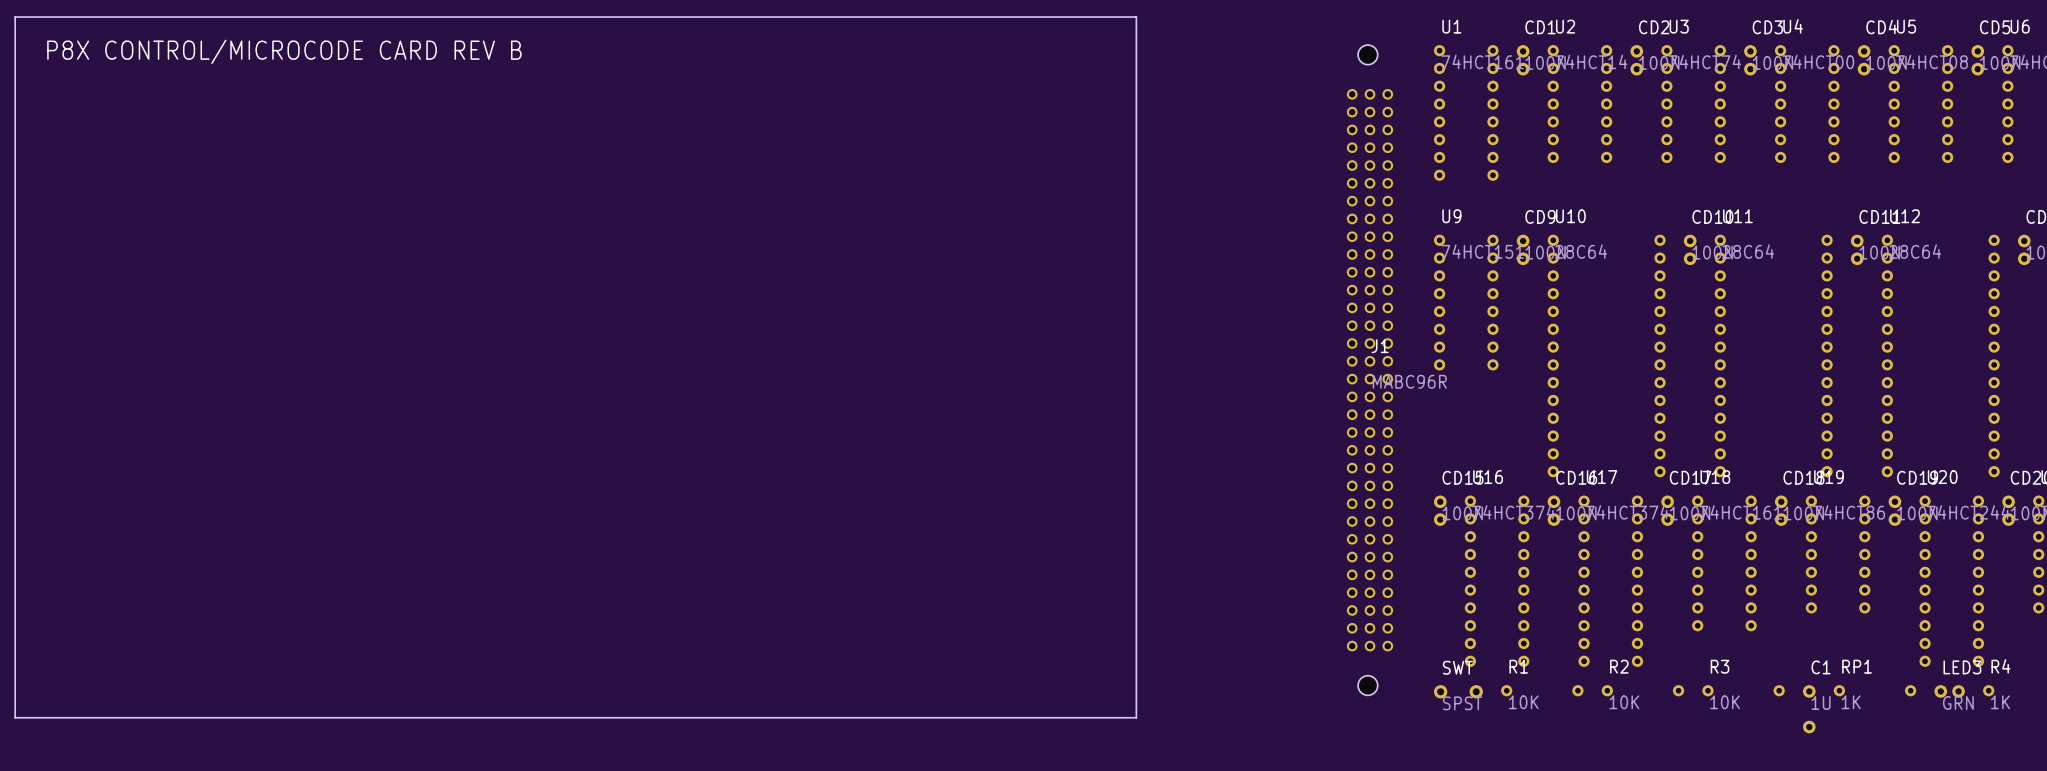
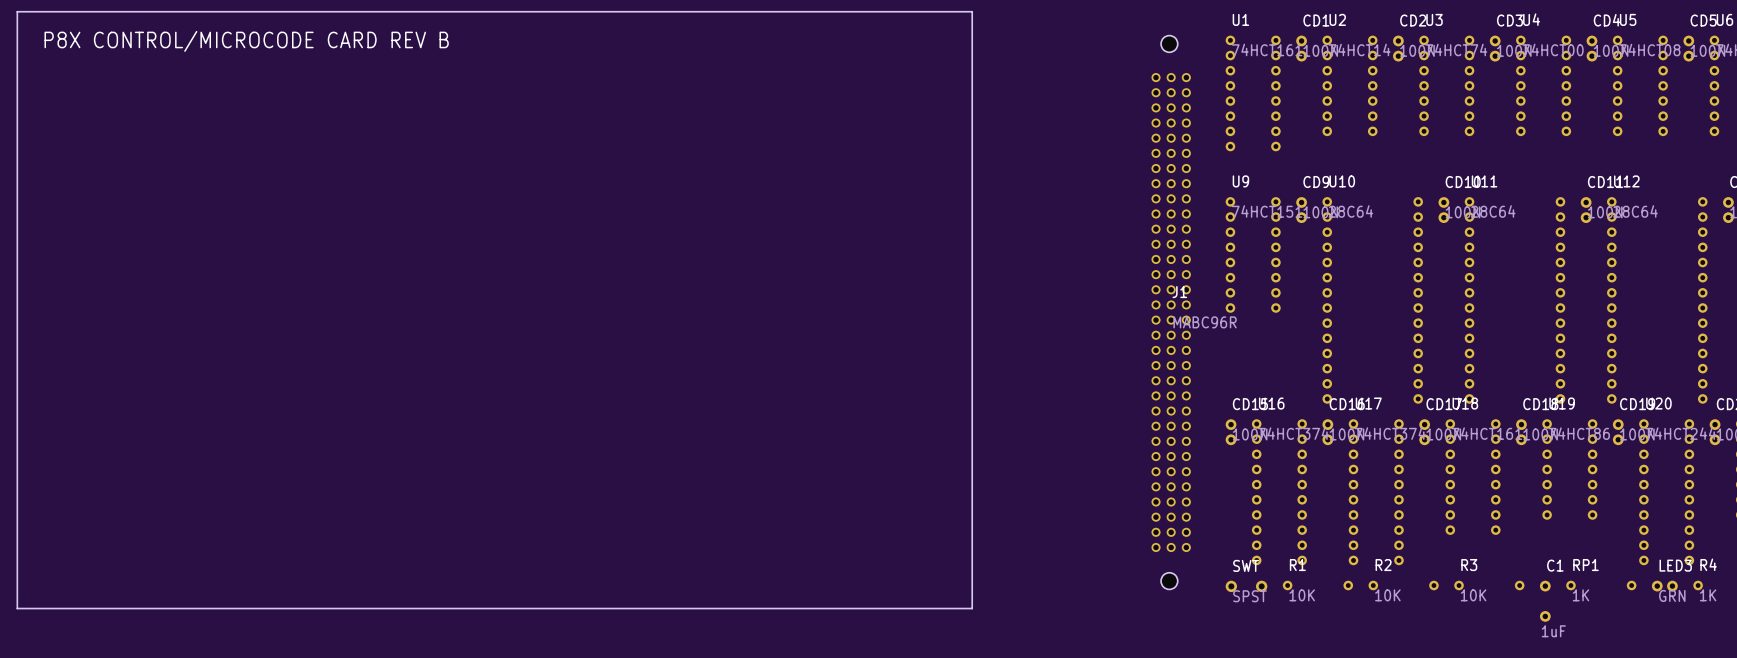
C1 value: 1U (1821, 702) -> 1uF (1553, 631)

